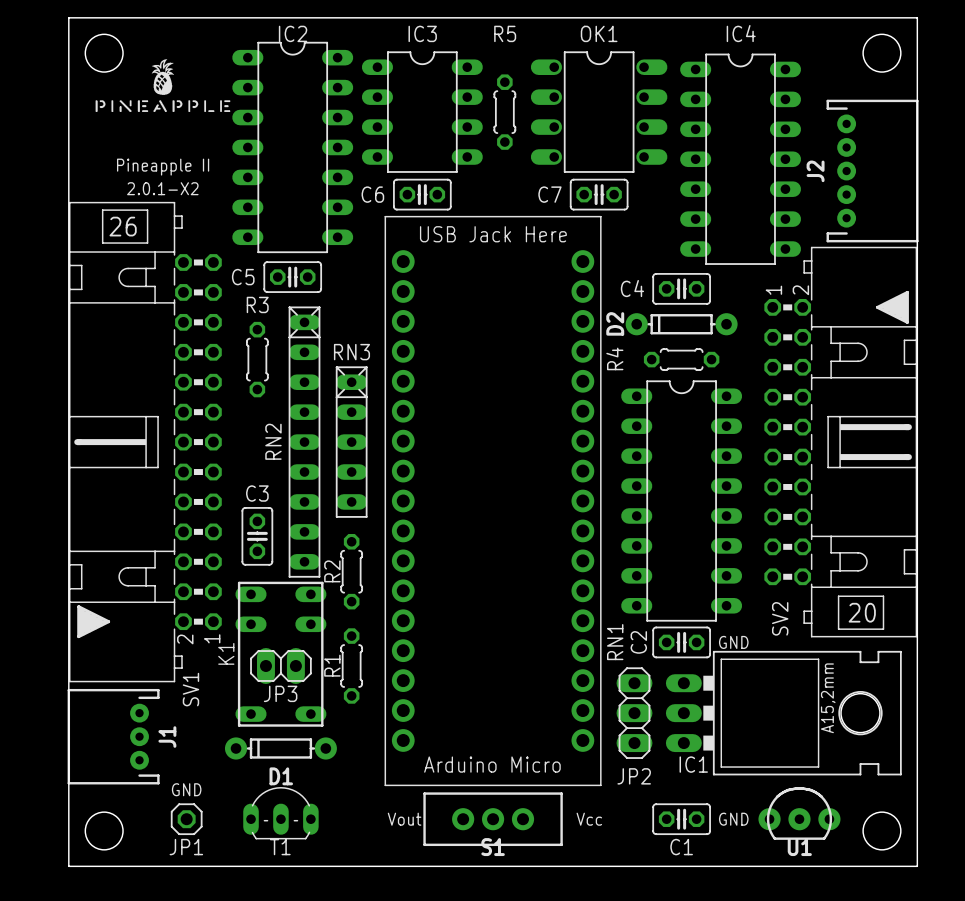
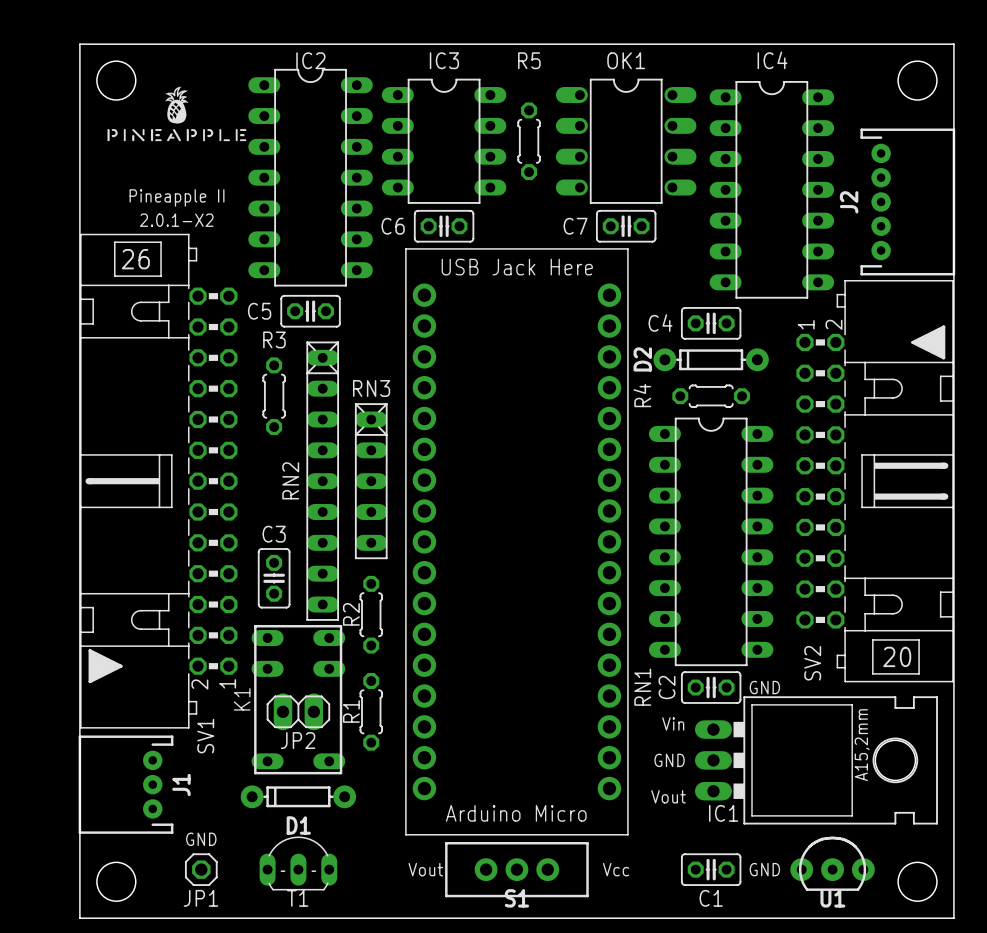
text: none -> Vin (673, 723)
JP3 name: JP3 (280, 693) -> JP2 (298, 740)
JP2: (634, 713) -> none
text: none -> GND (669, 760)
text: none -> Vout (668, 796)

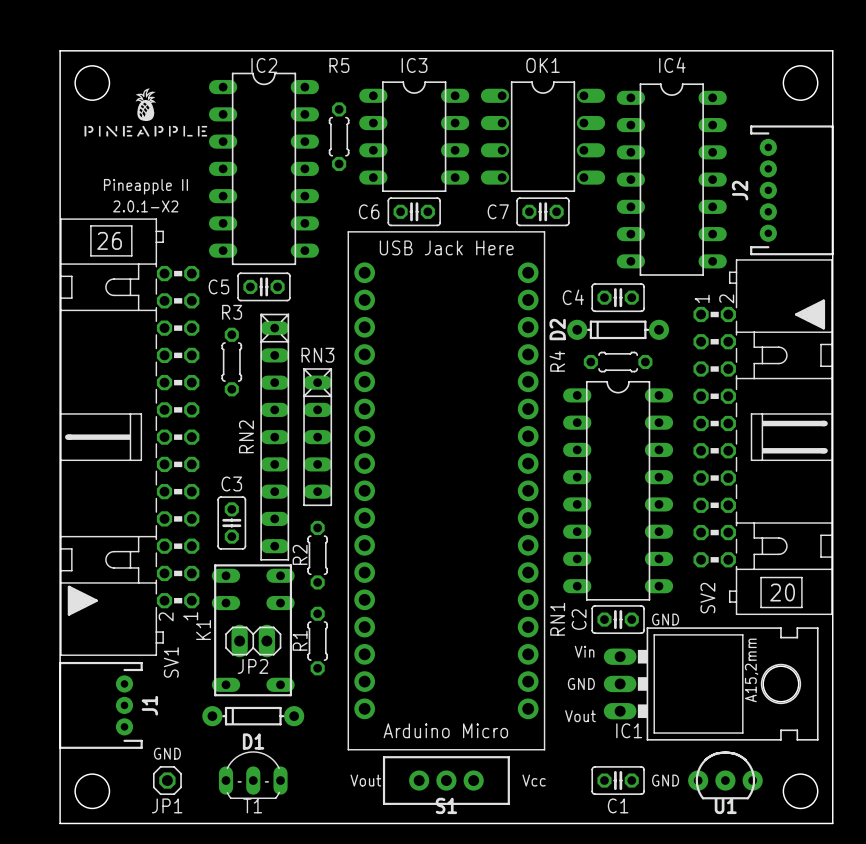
IC3 position: (444, 141) -> (414, 136)
R5 position: (529, 141) -> (339, 136)
C6 position: (444, 226) -> (414, 211)

